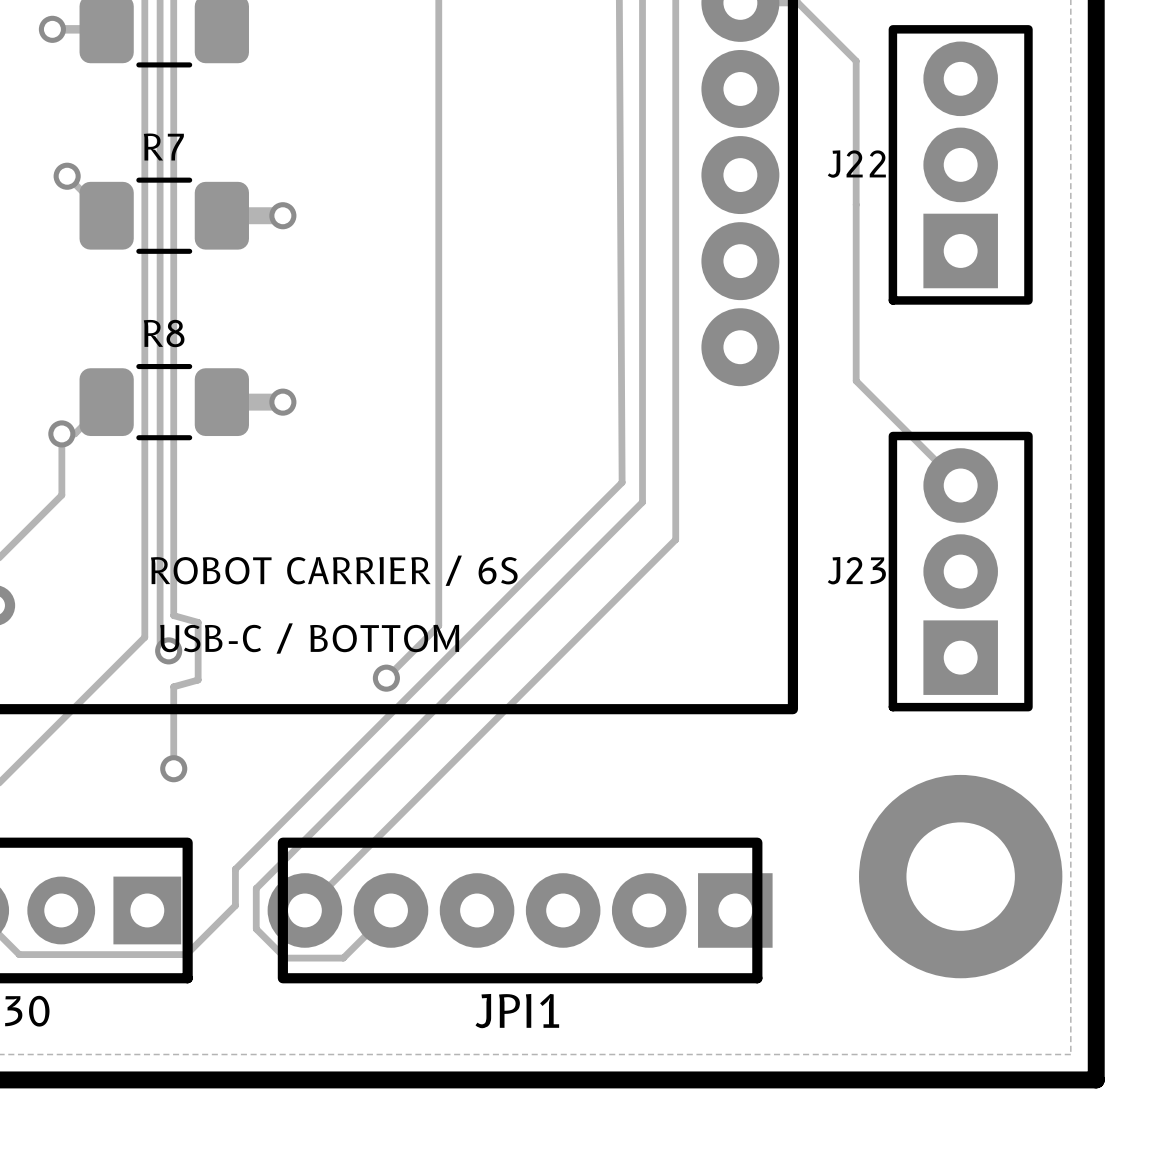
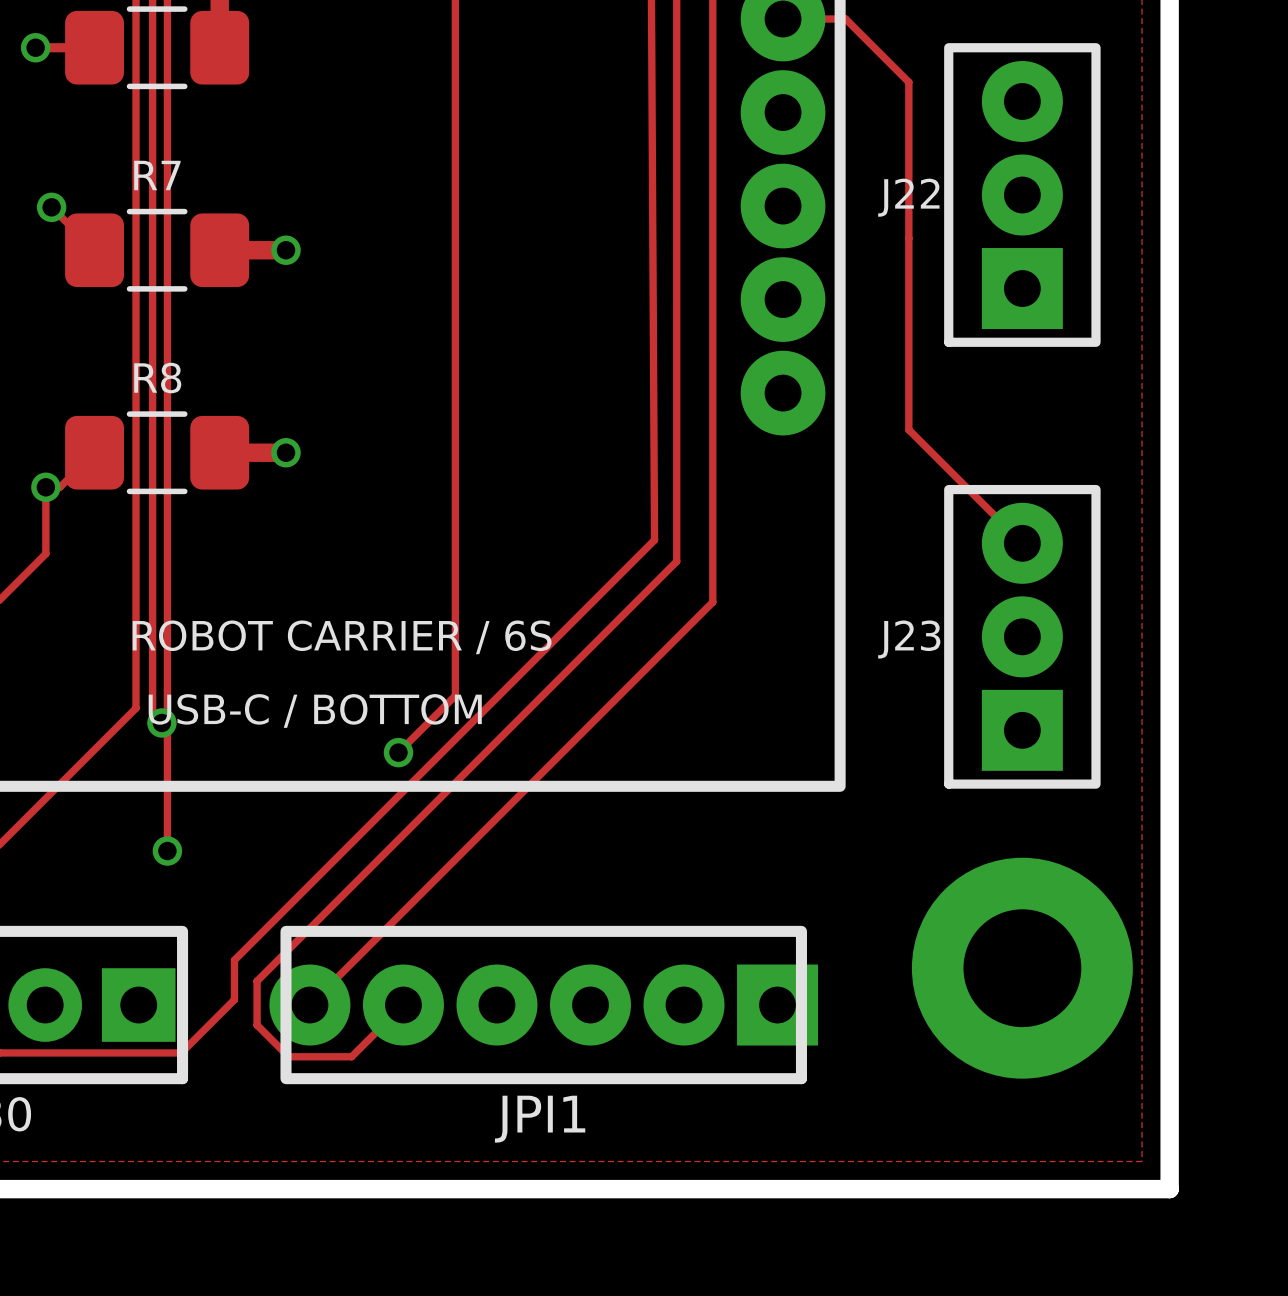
track: (173, 615) (198, 622) (198, 680) (173, 686) -> (167, 684) (167, 762)

